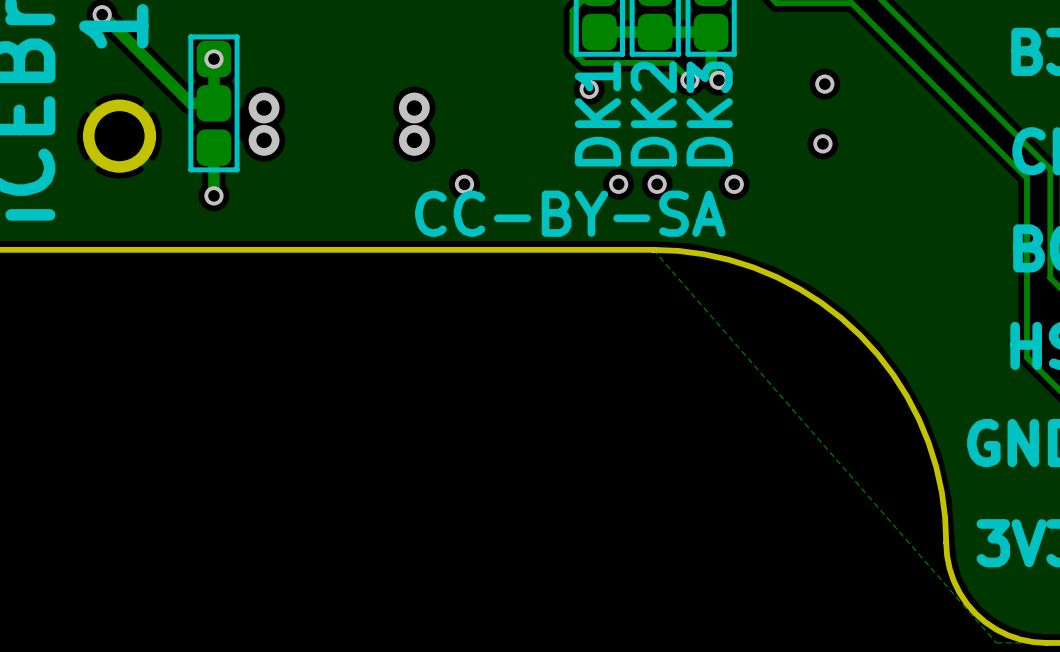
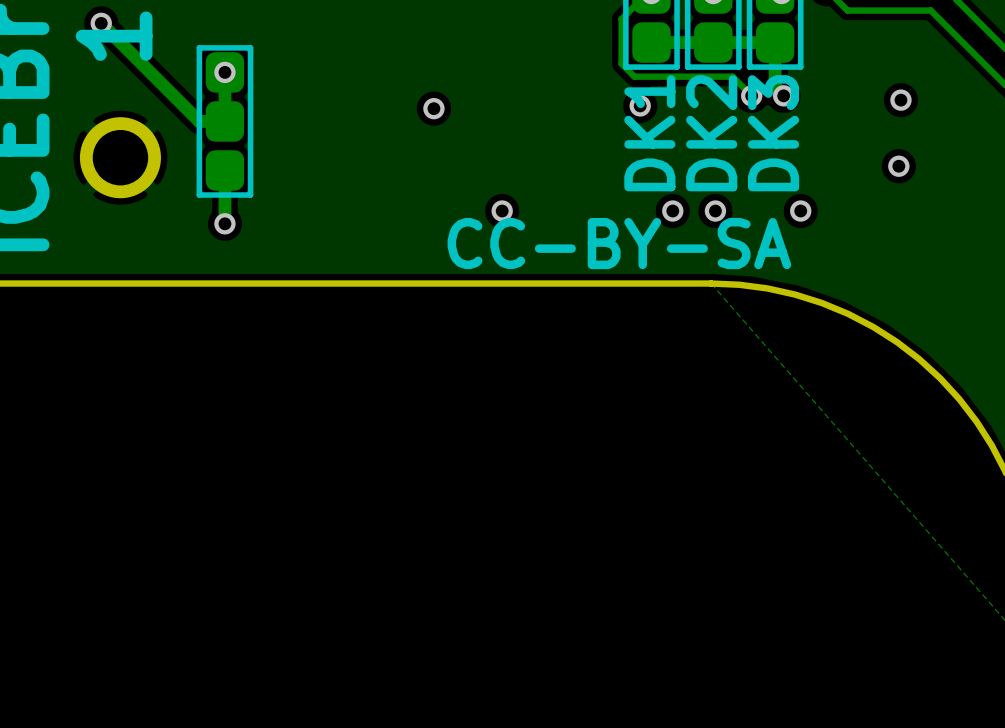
via size: [398, 92, 430, 124] -> [423, 97, 445, 120]
via: (264, 108) -> none
via: (264, 140) -> none
via: (414, 140) -> none

